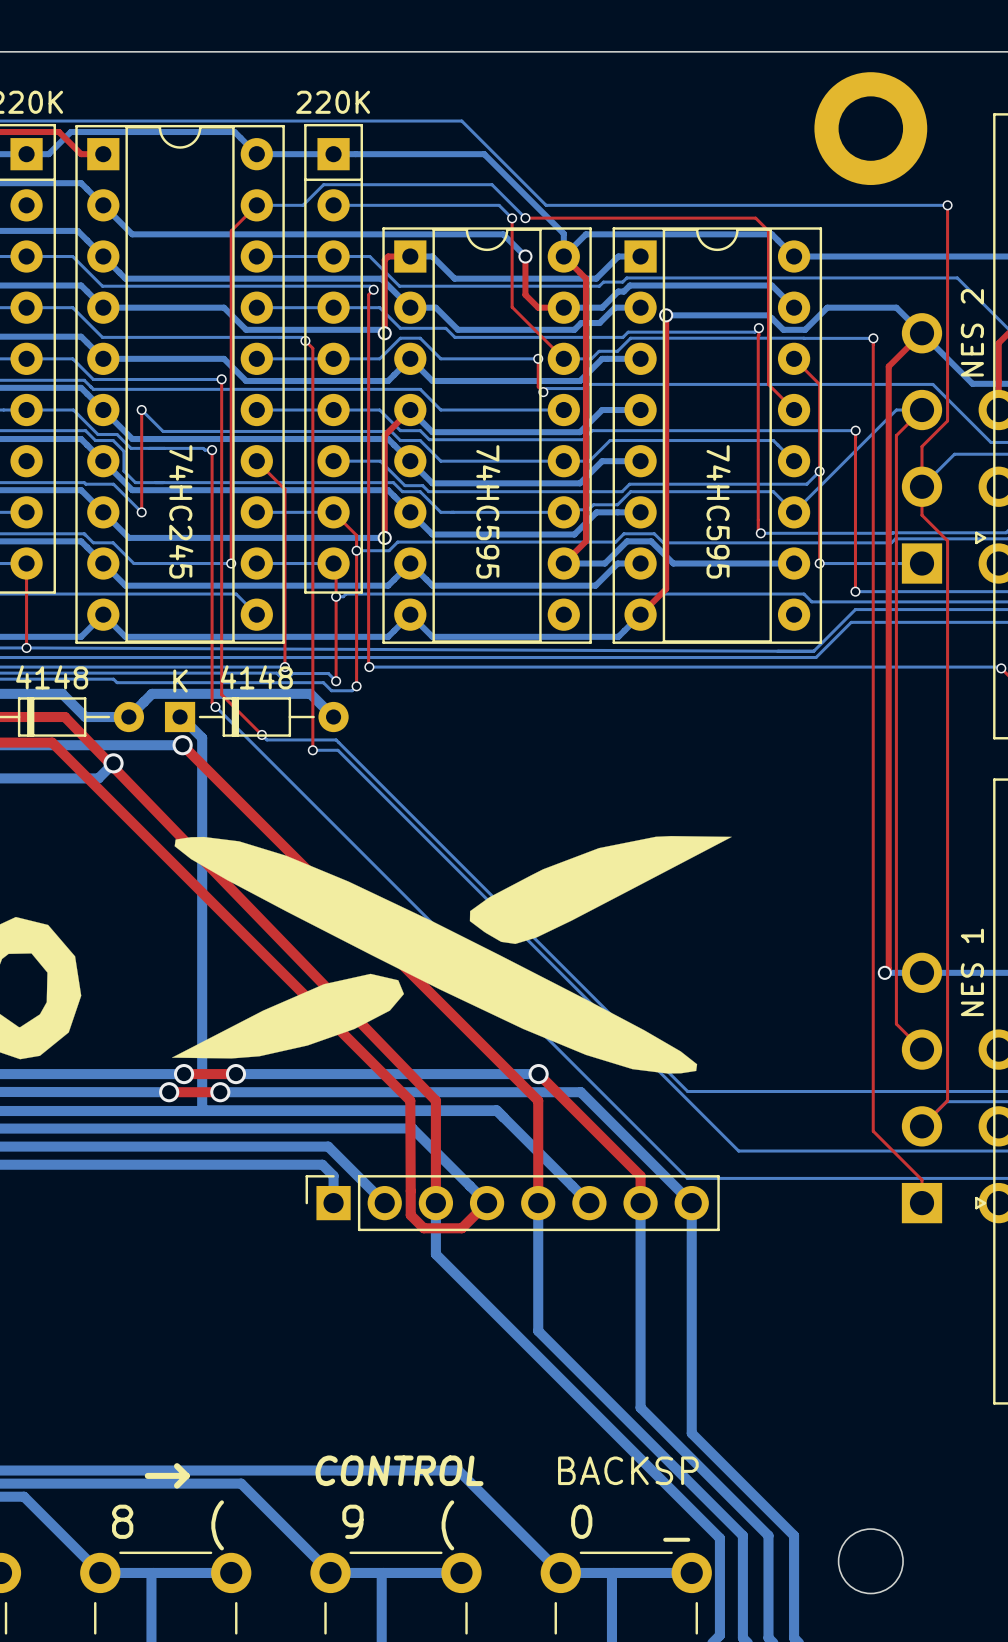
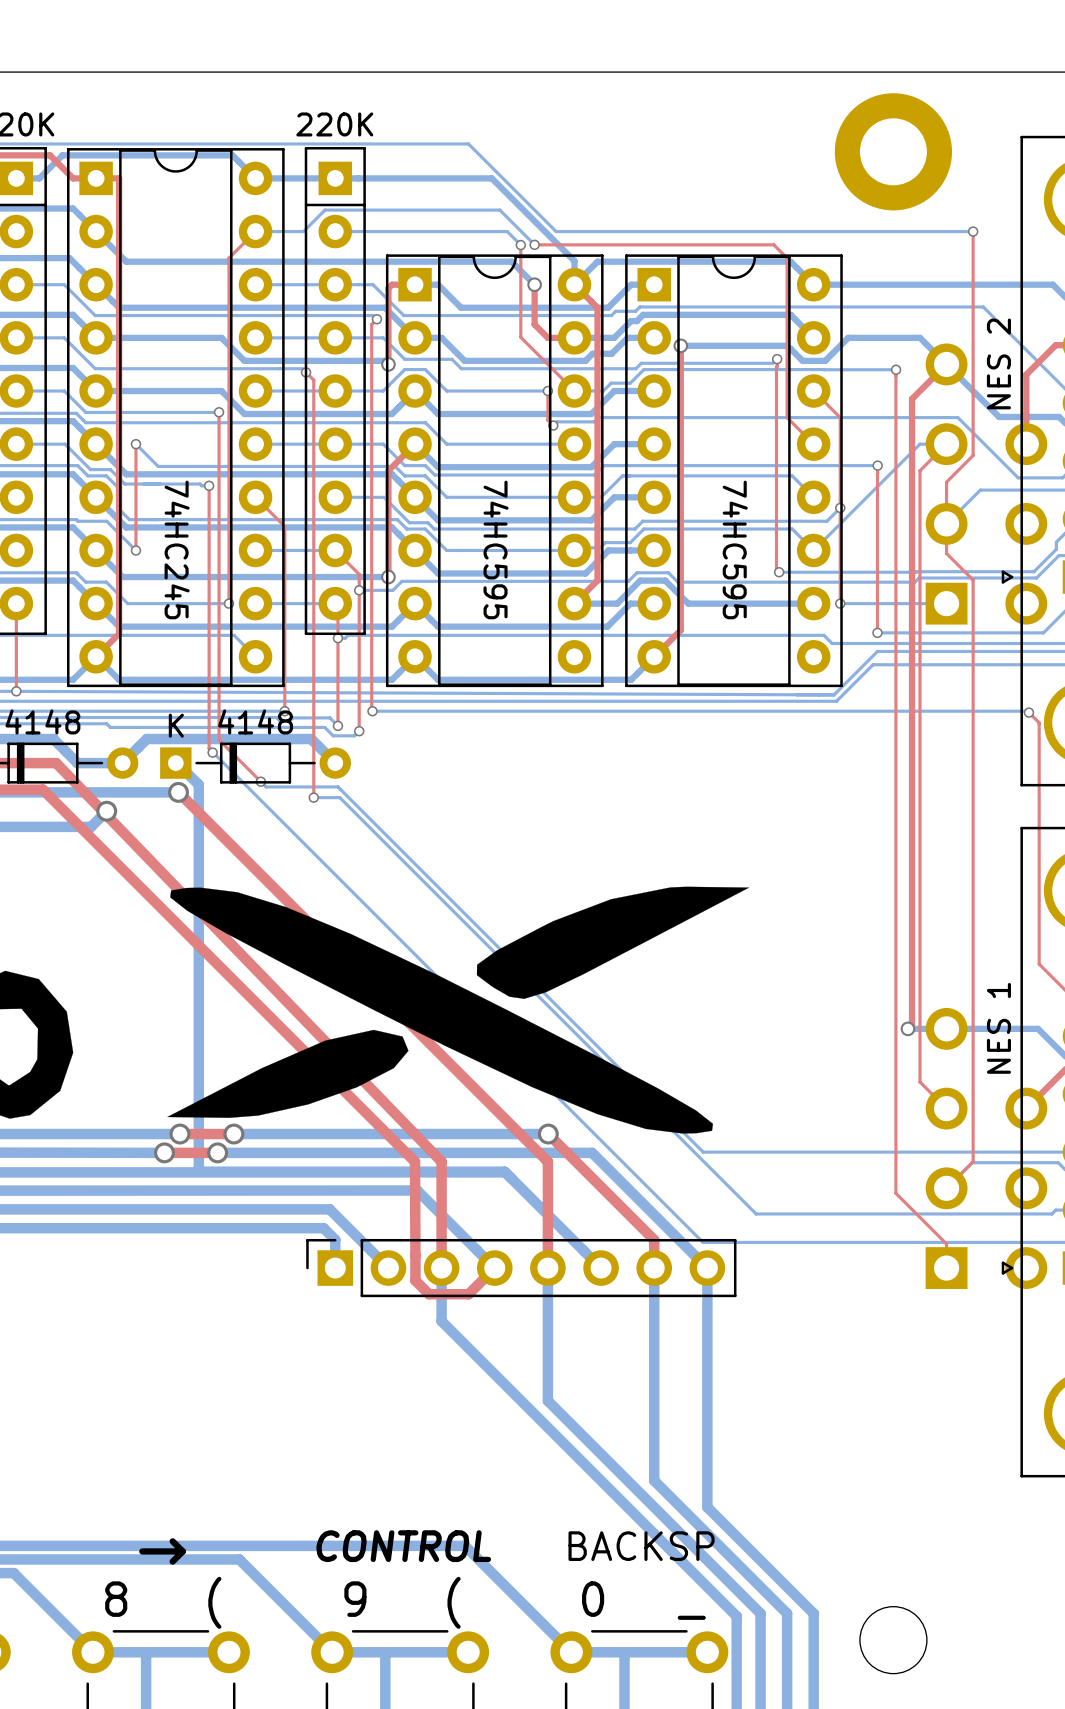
top track: none -> (96, 178) (119, 178) (119, 633) (96, 656)

